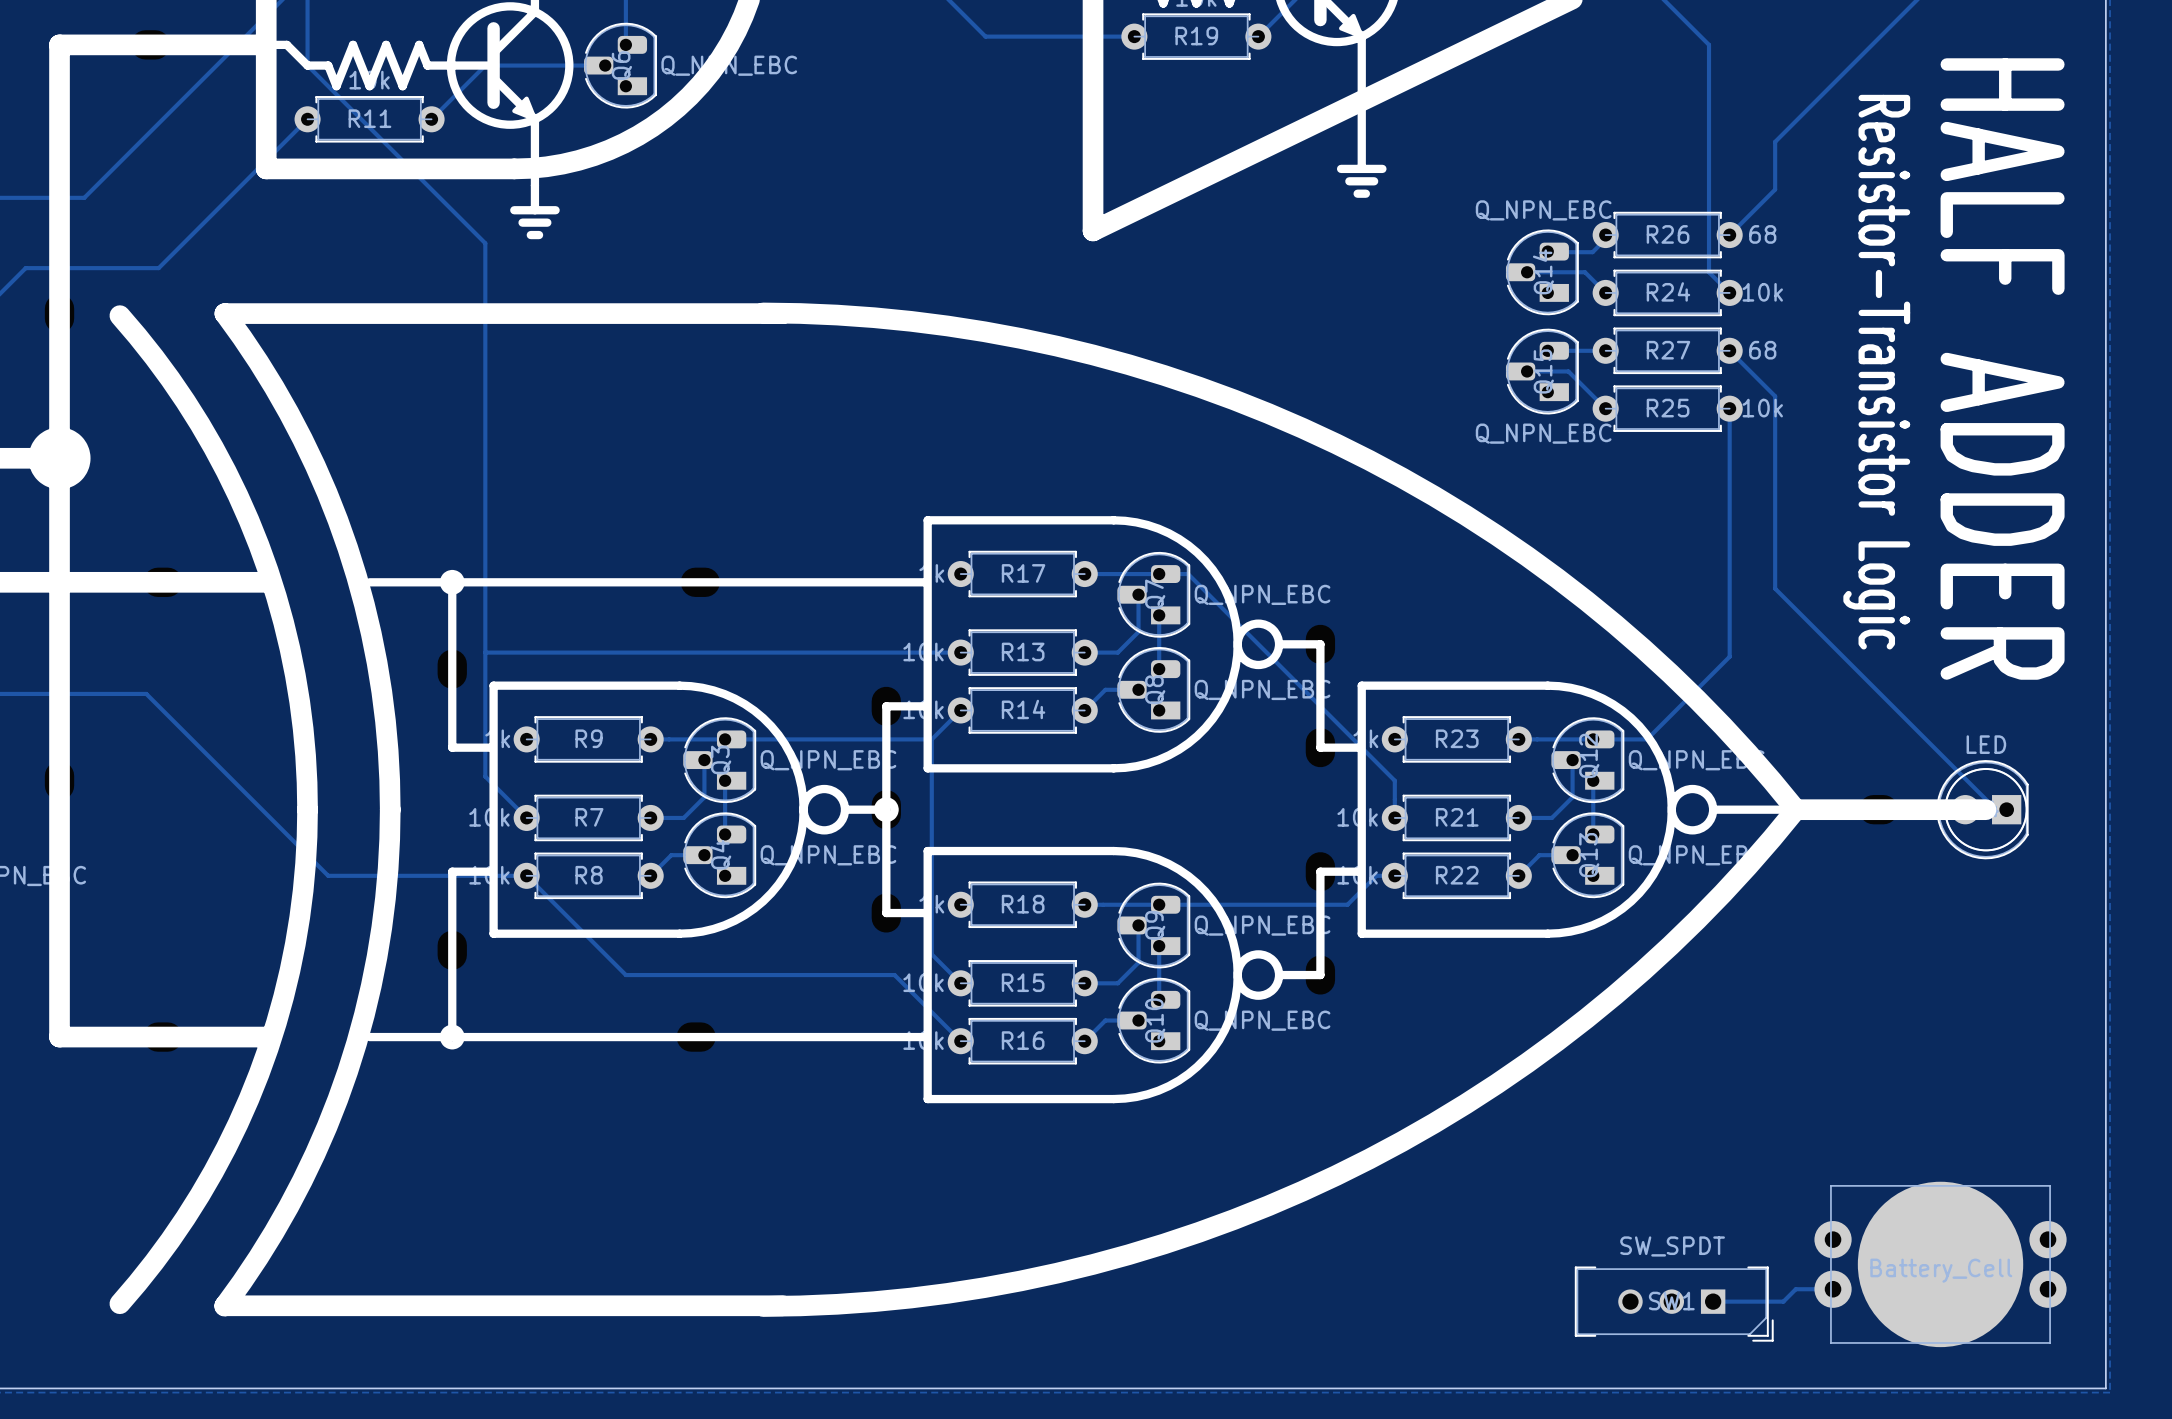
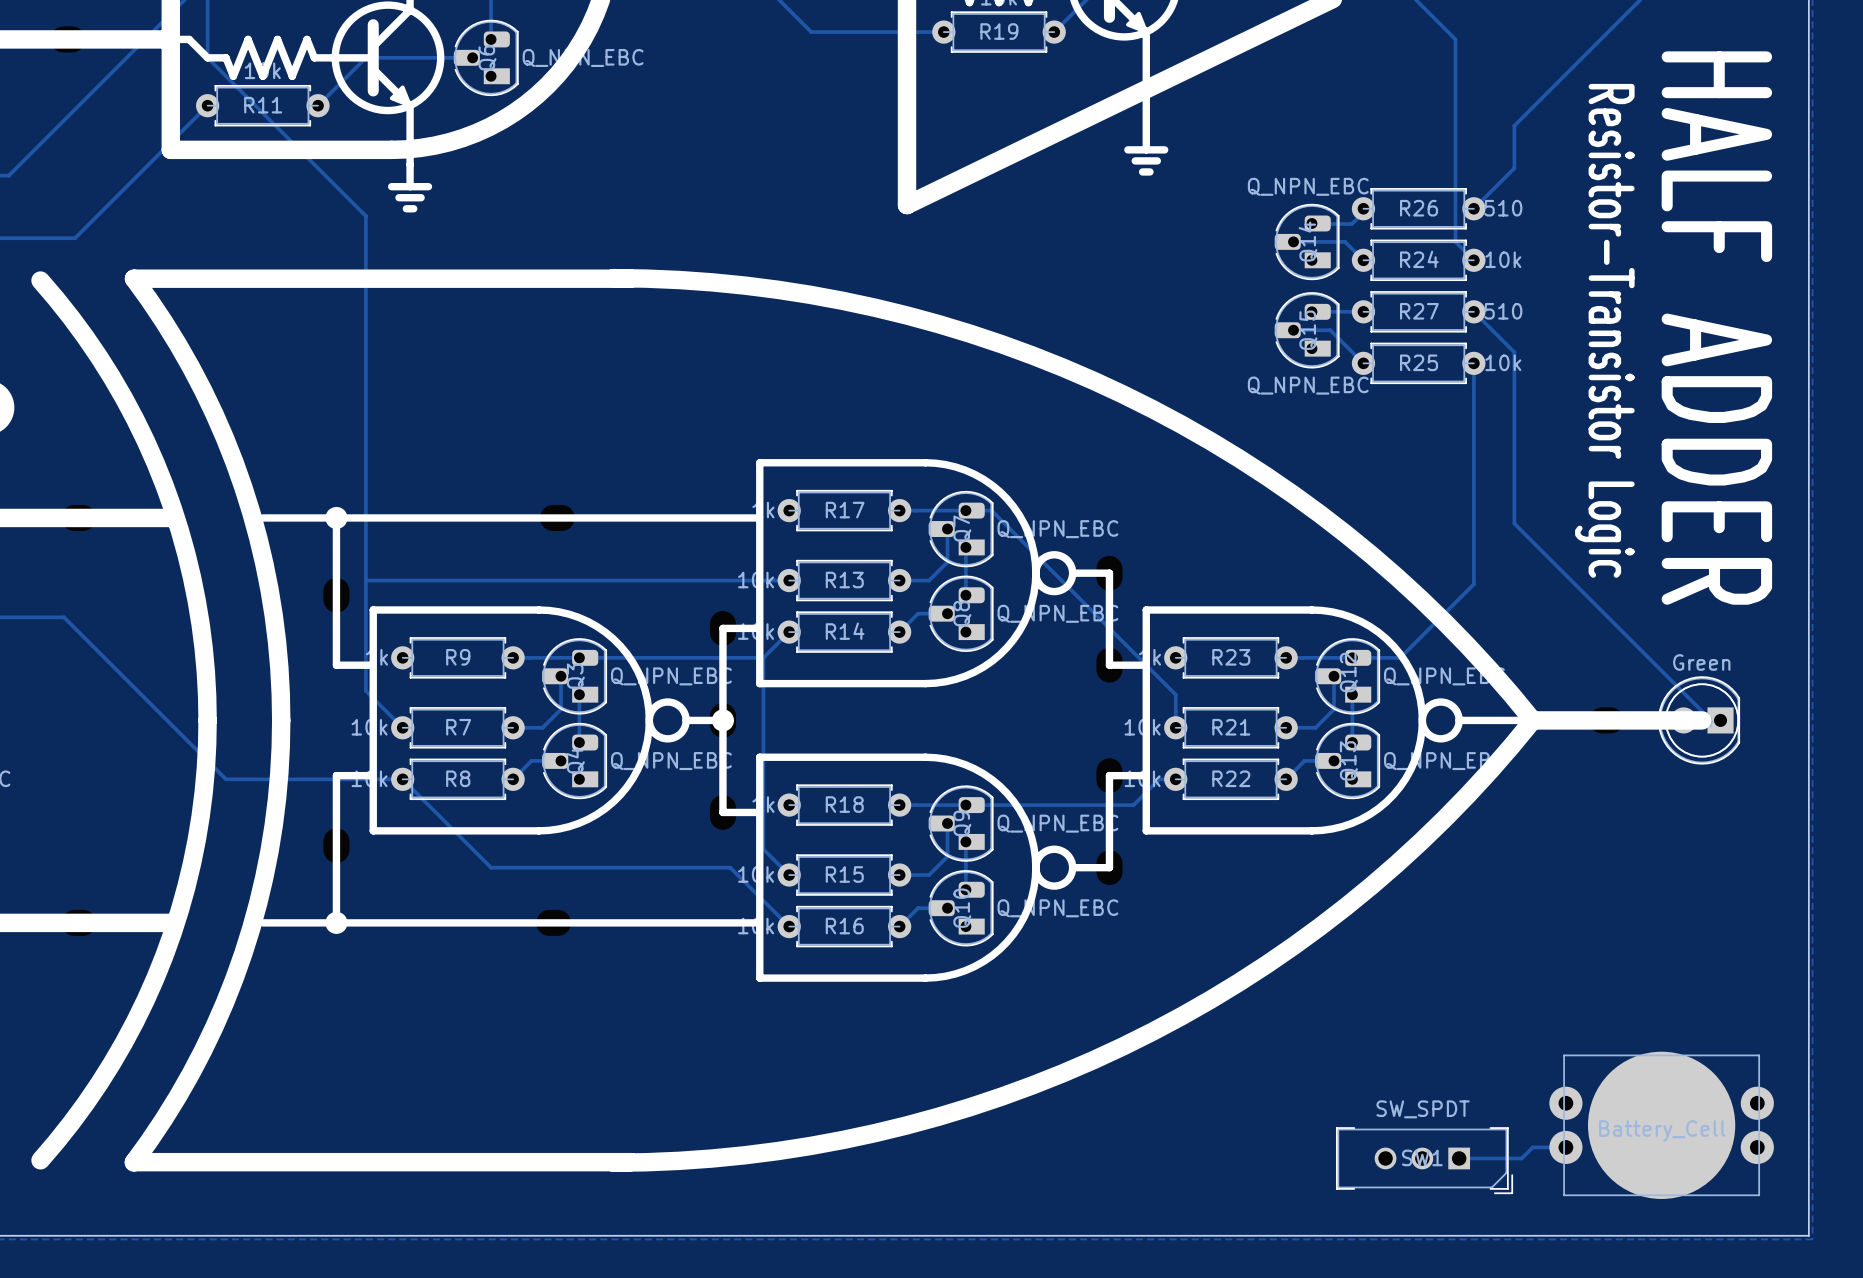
R26 value: 68 (1762, 234) -> 510 (1503, 208)
R27 value: 68 (1762, 350) -> 510 (1503, 311)
part value: LED (1986, 744) -> Green (1701, 662)

